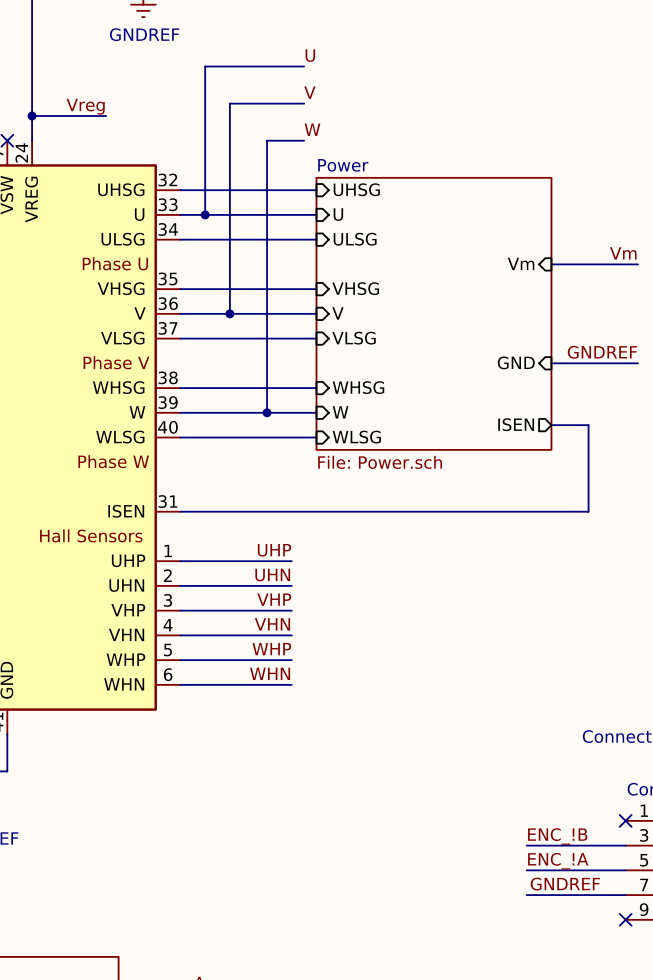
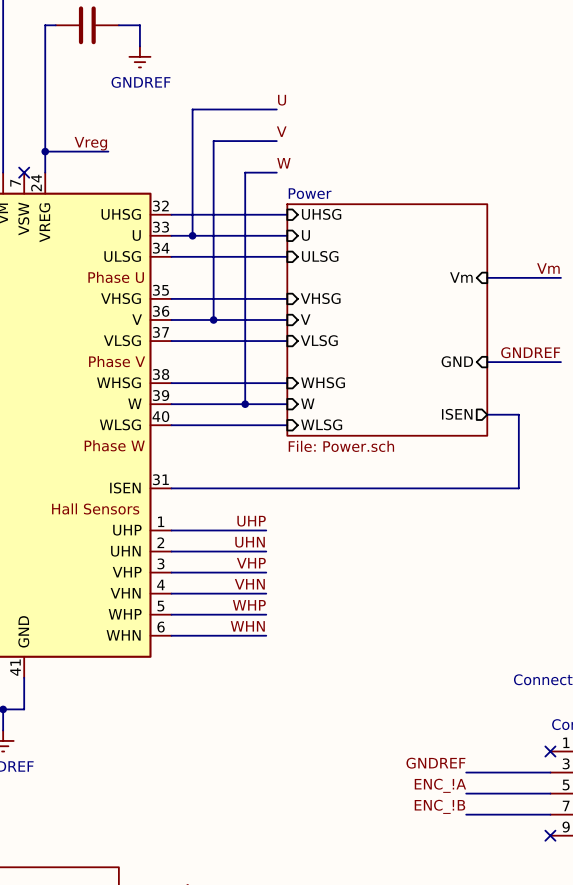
label position: ENC_!B (557, 836) -> ENC_!B (439, 806)
label position: ENC_!A (558, 861) -> ENC_!A (440, 785)
label position: GNDREF (565, 884) -> GNDREF (435, 763)

